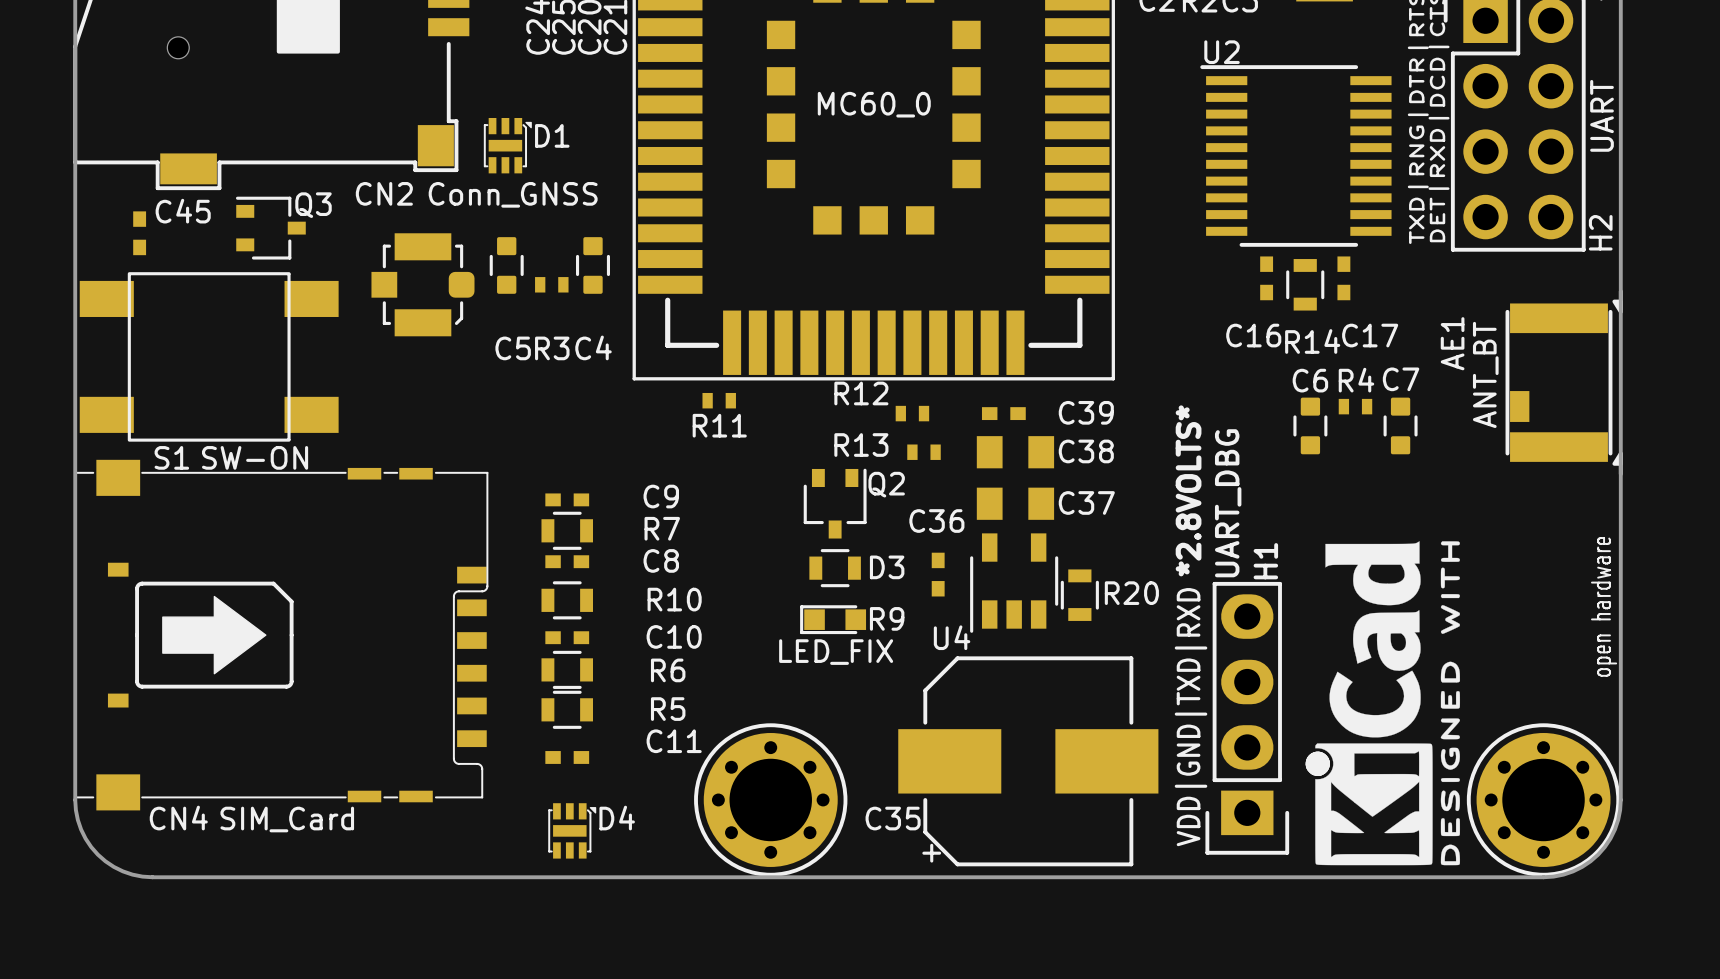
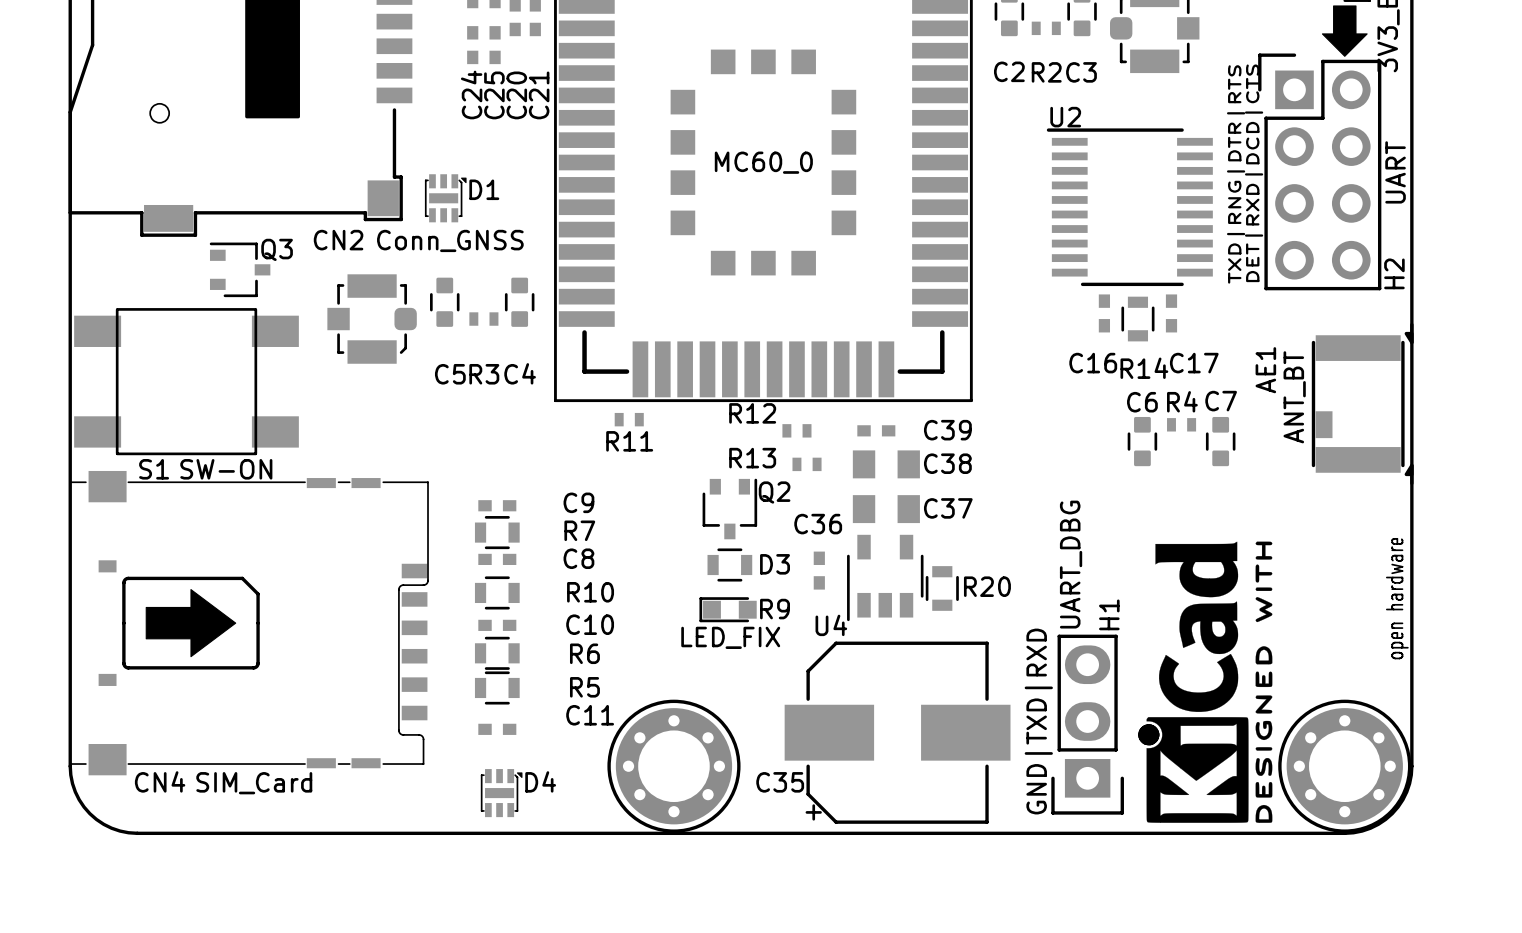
C45: (139, 233) -> none
text: *2.8VOLTS* (1188, 490) -> none
H1 footprint: [1205, 581, 1290, 855] -> [1051, 634, 1124, 815]
text: VDD|GND|TXD|RXD (1191, 717) -> GND|TXD|RXD (1038, 721)

